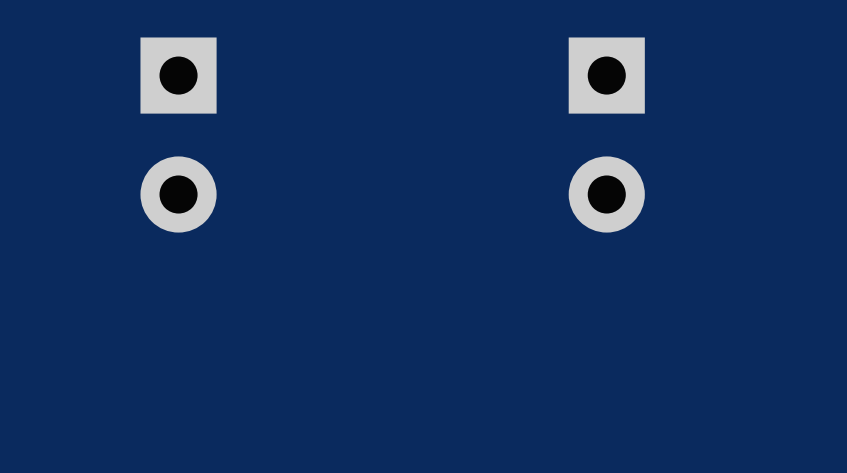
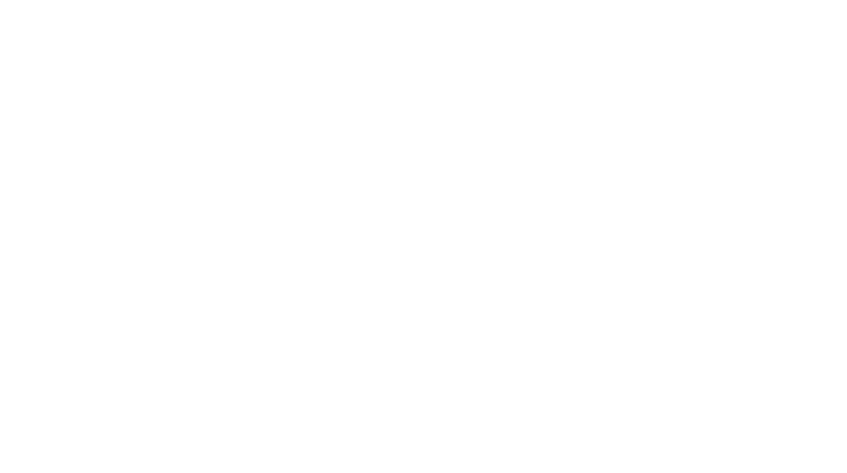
part: (178, 135) -> none
part: (606, 135) -> none

